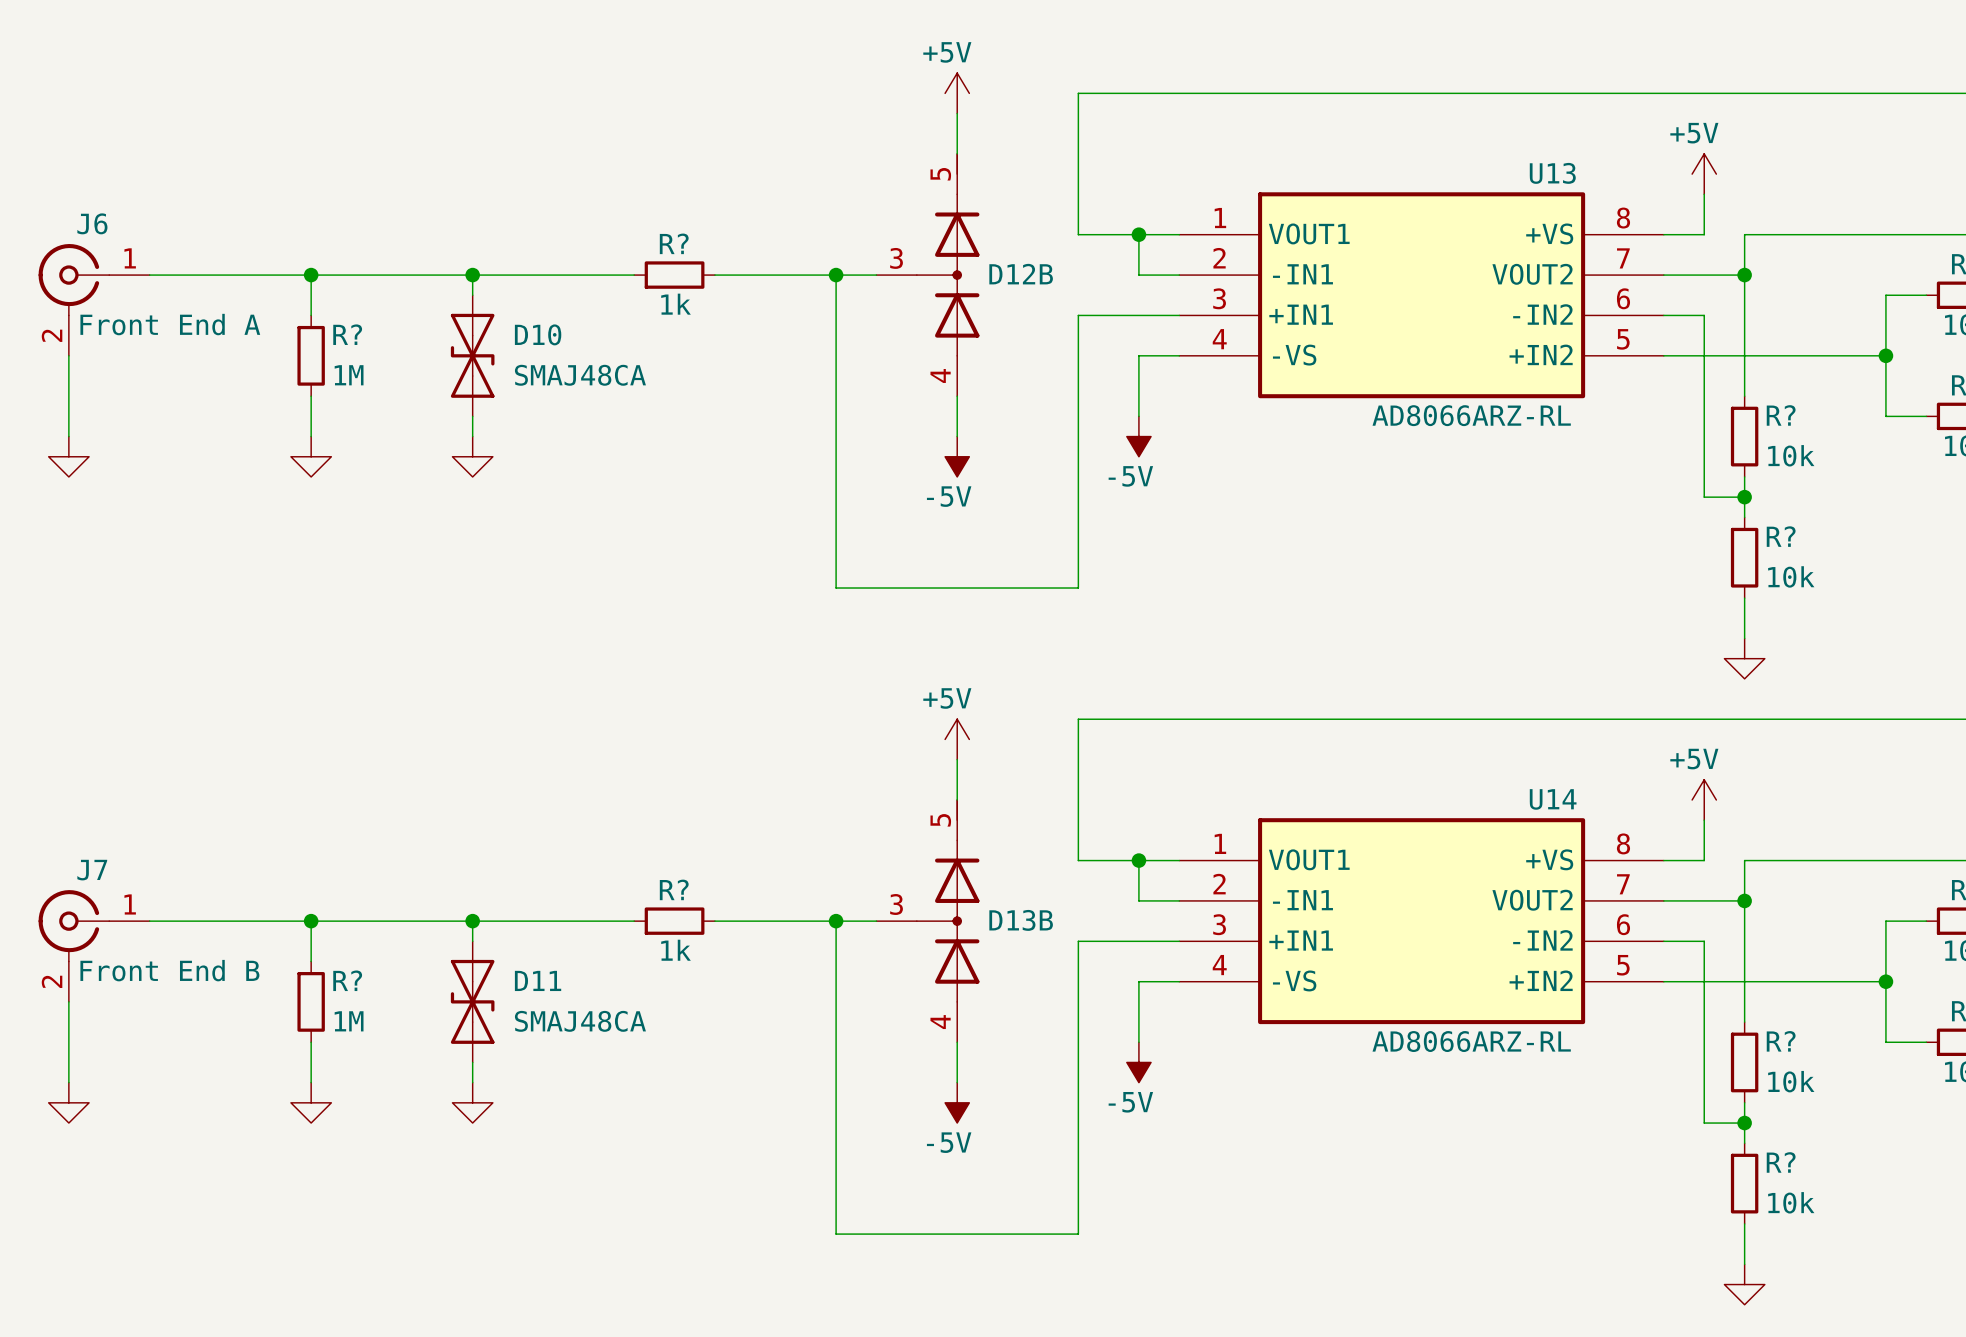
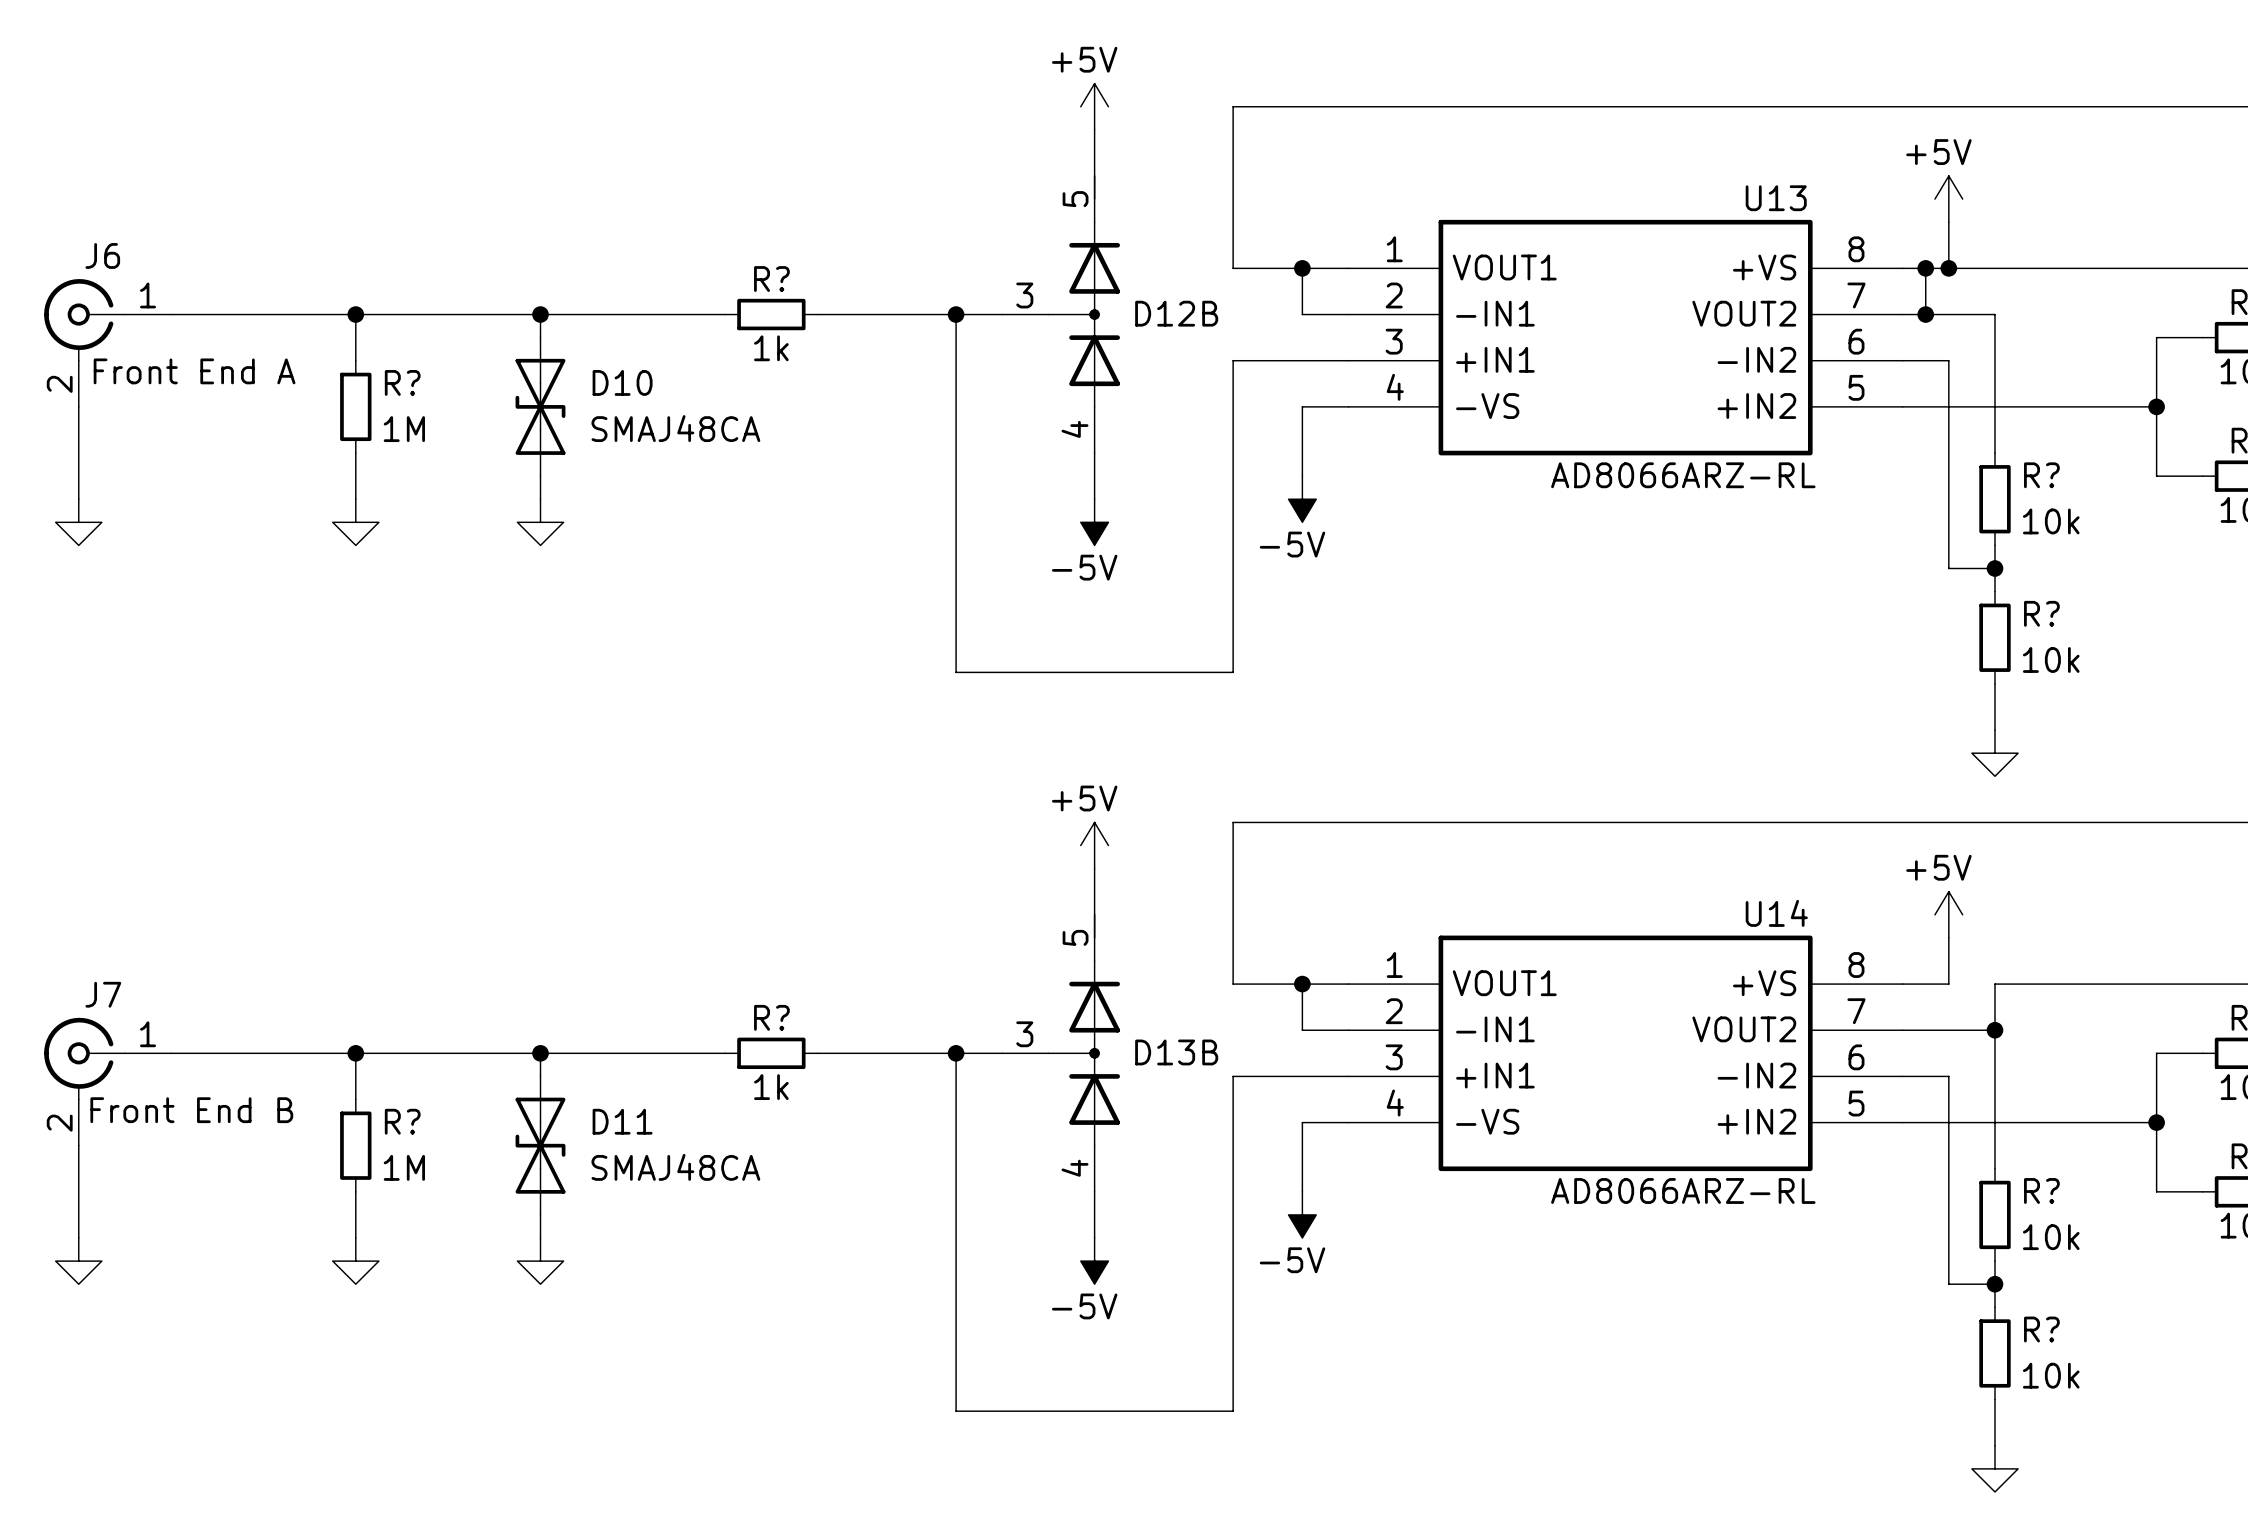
wire: none -> (1925, 268) (1925, 314)
junction: none -> (1925, 268)
junction: none -> (1948, 268)
wire: (1744, 234) (1744, 275) -> (1995, 268) (1948, 268)
junction: none -> (1925, 314)
junction: (1744, 275) -> none

